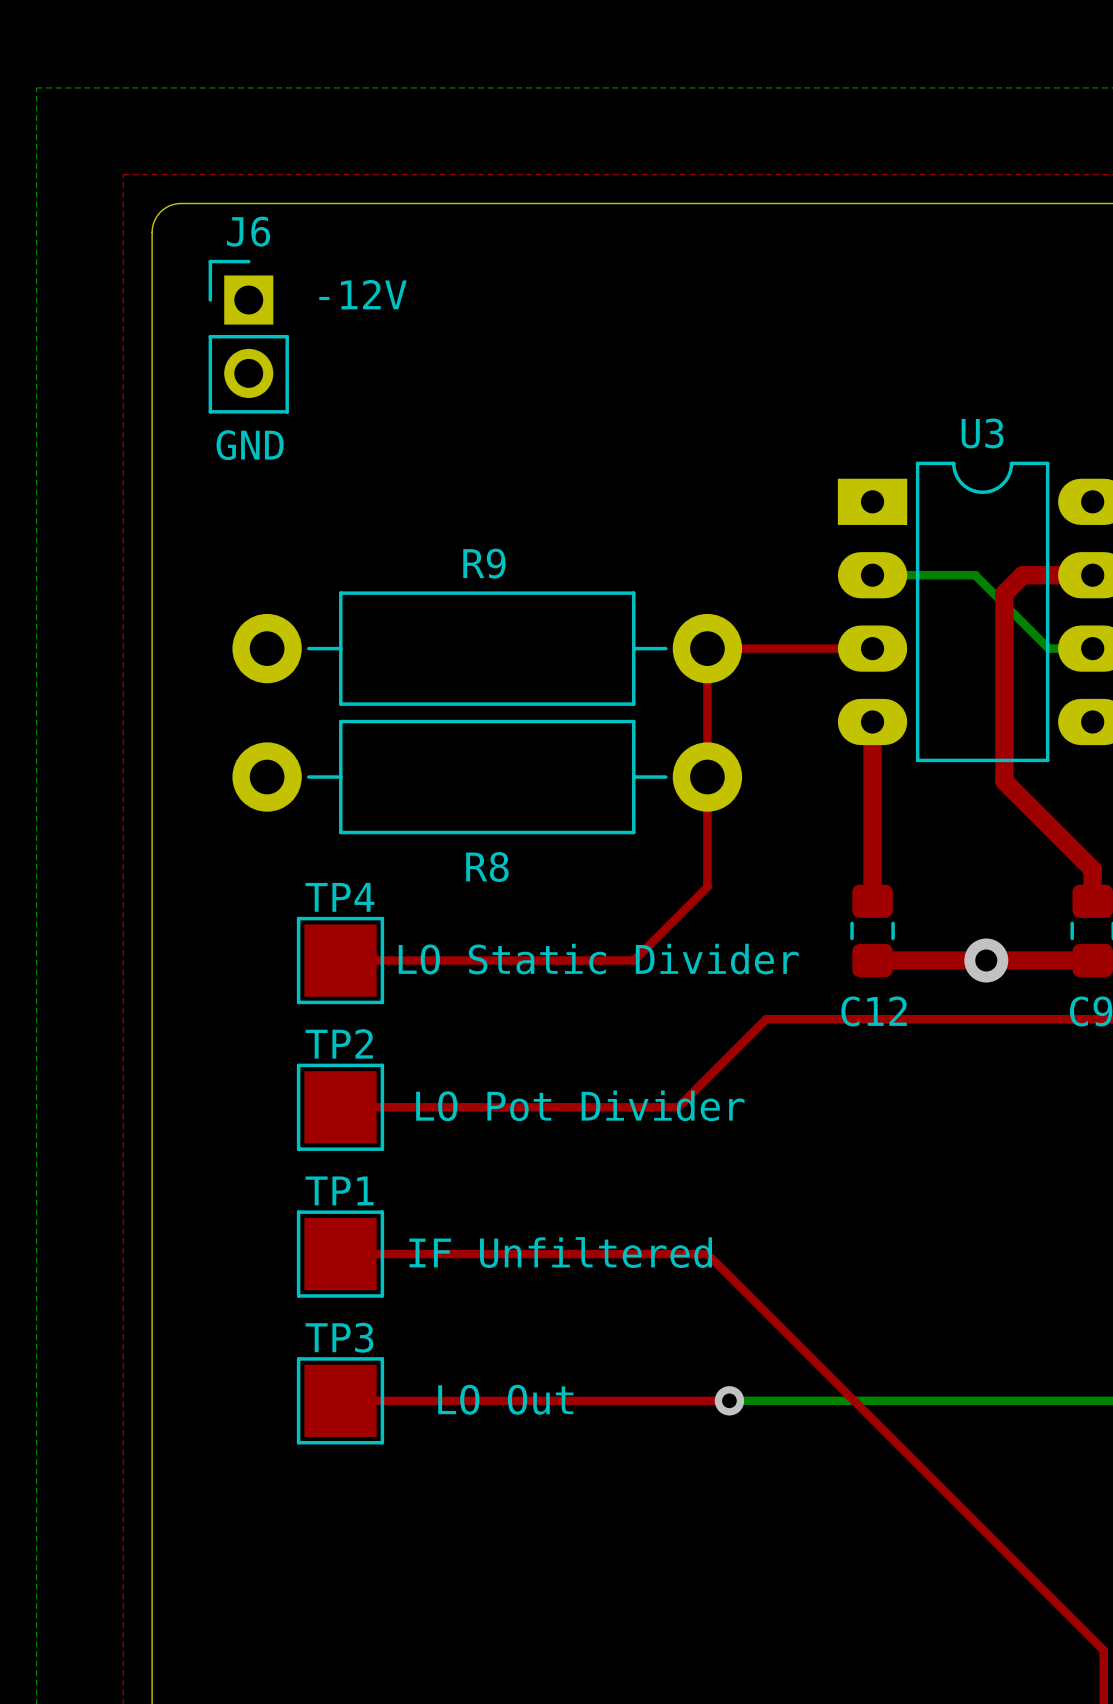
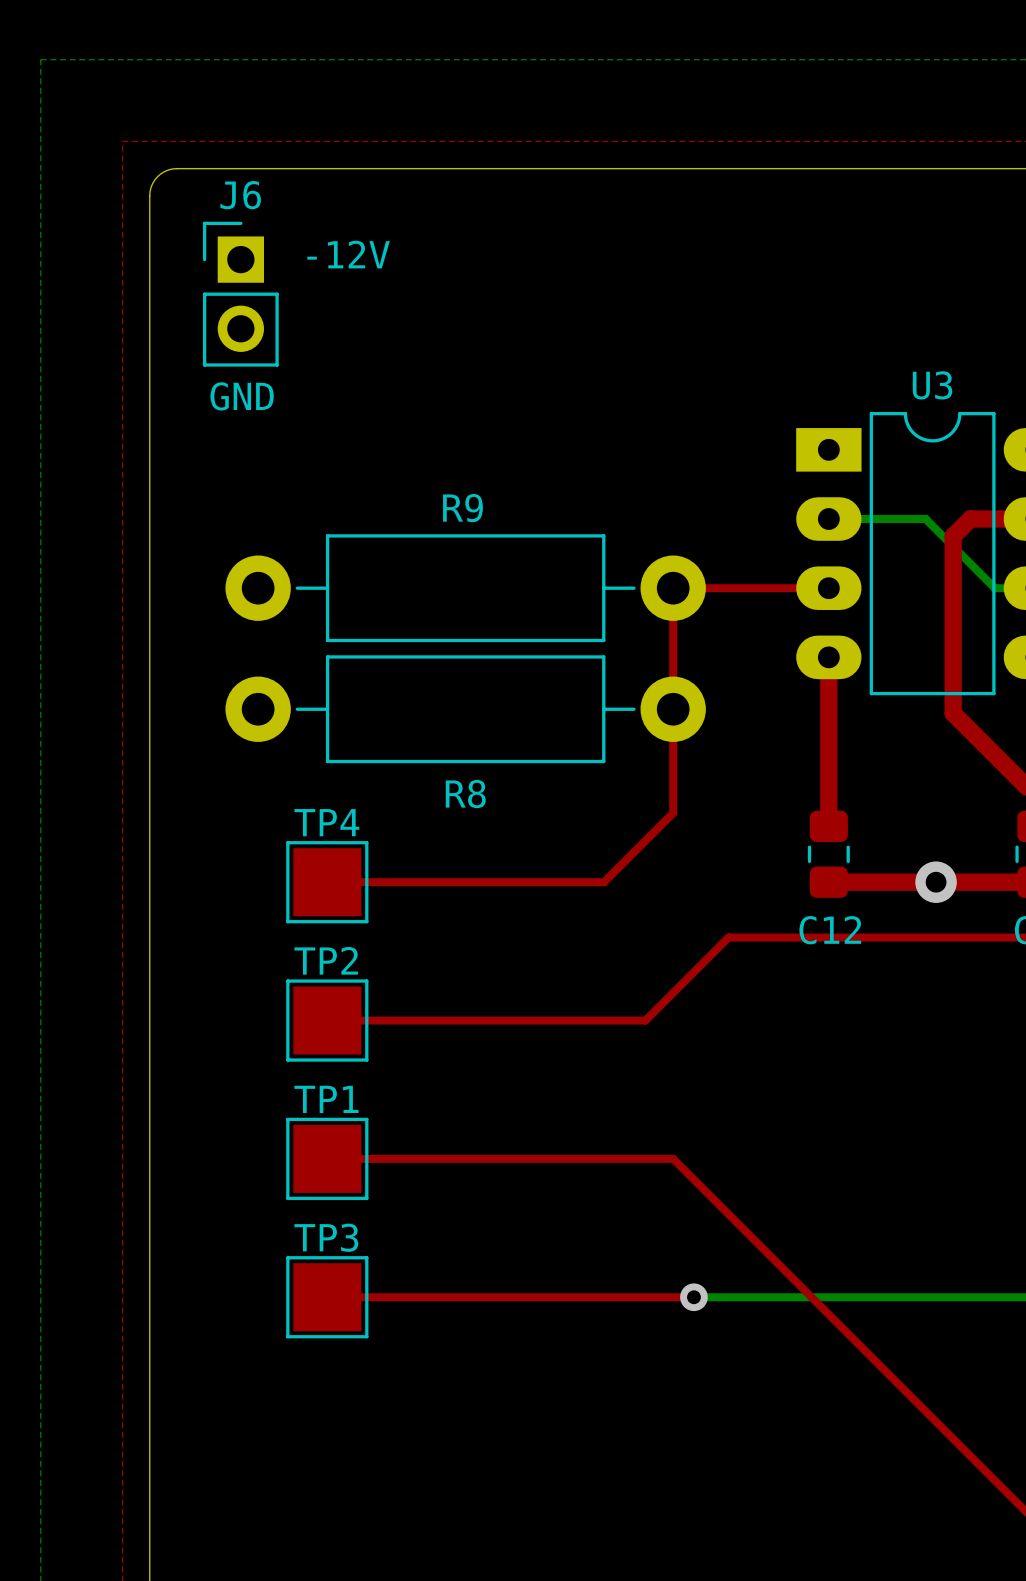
text: LO Static Divider (598, 959) -> none
text: LO Pot Divider (580, 1105) -> none
text: IF Unfiltered (560, 1252) -> none
text: LO Out (505, 1399) -> none

